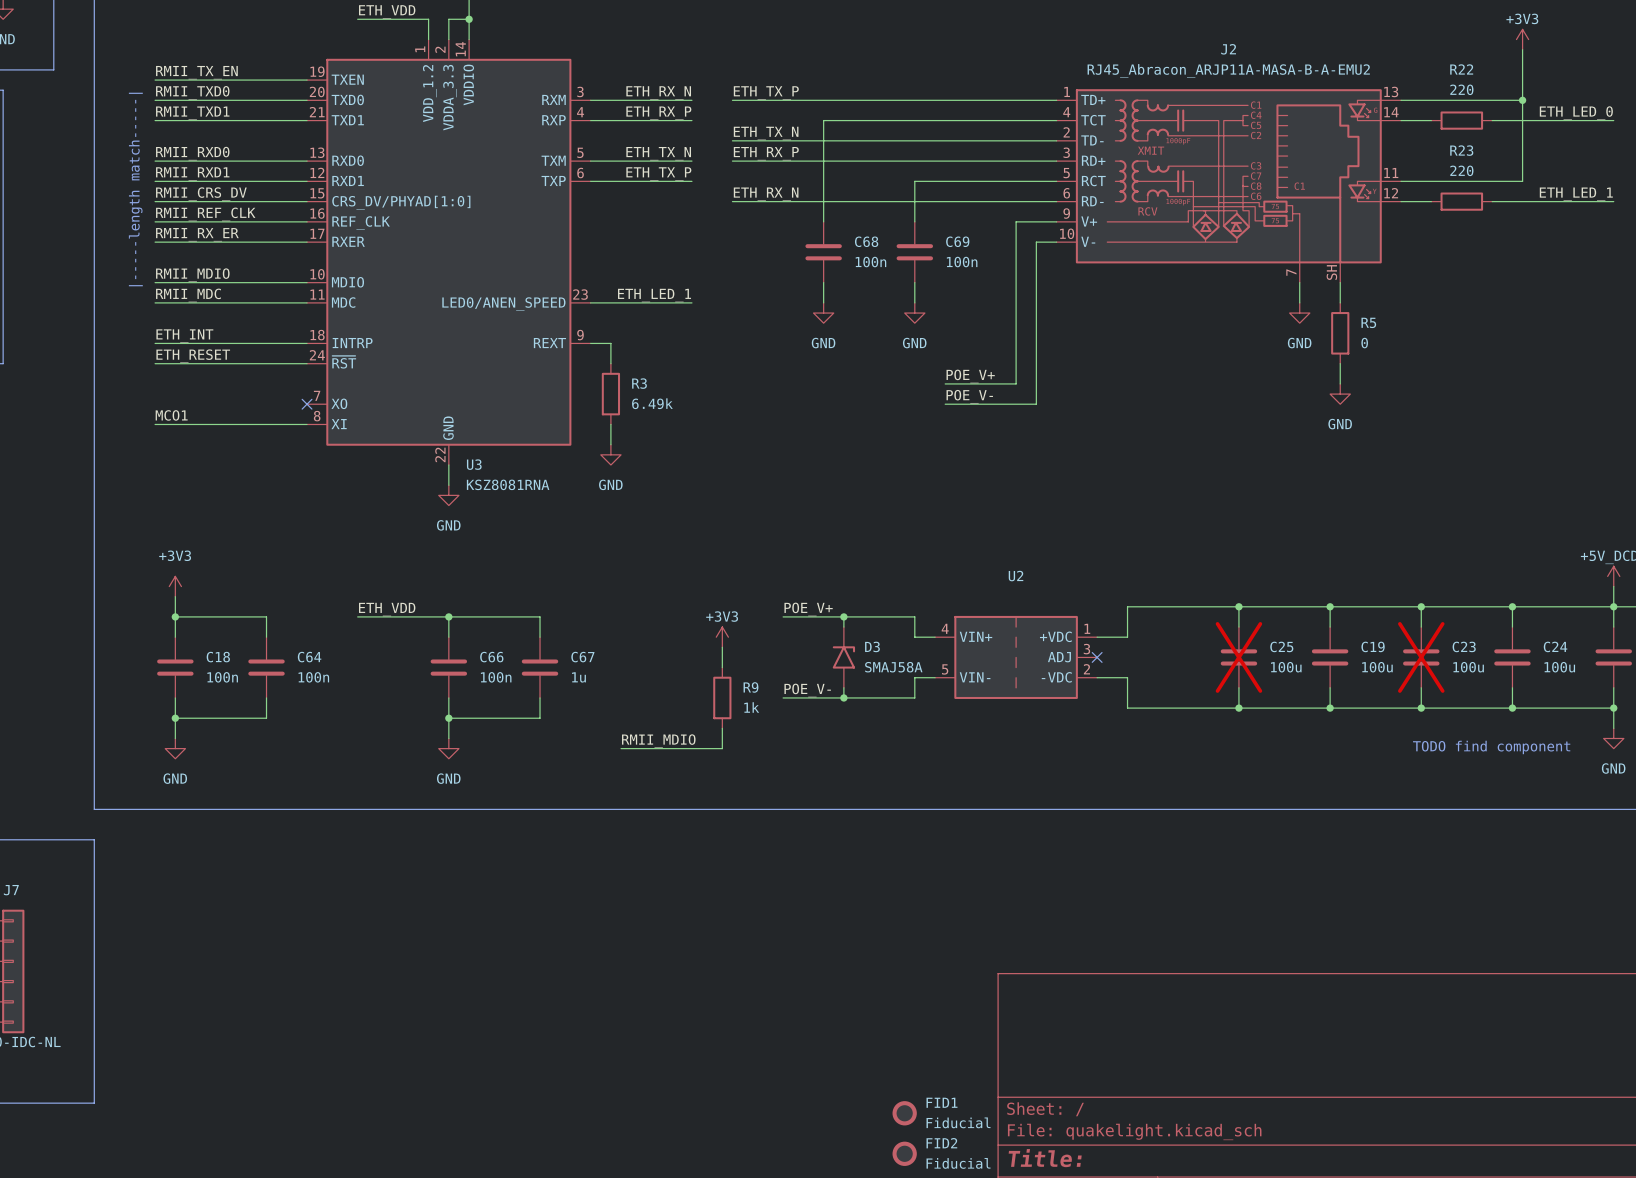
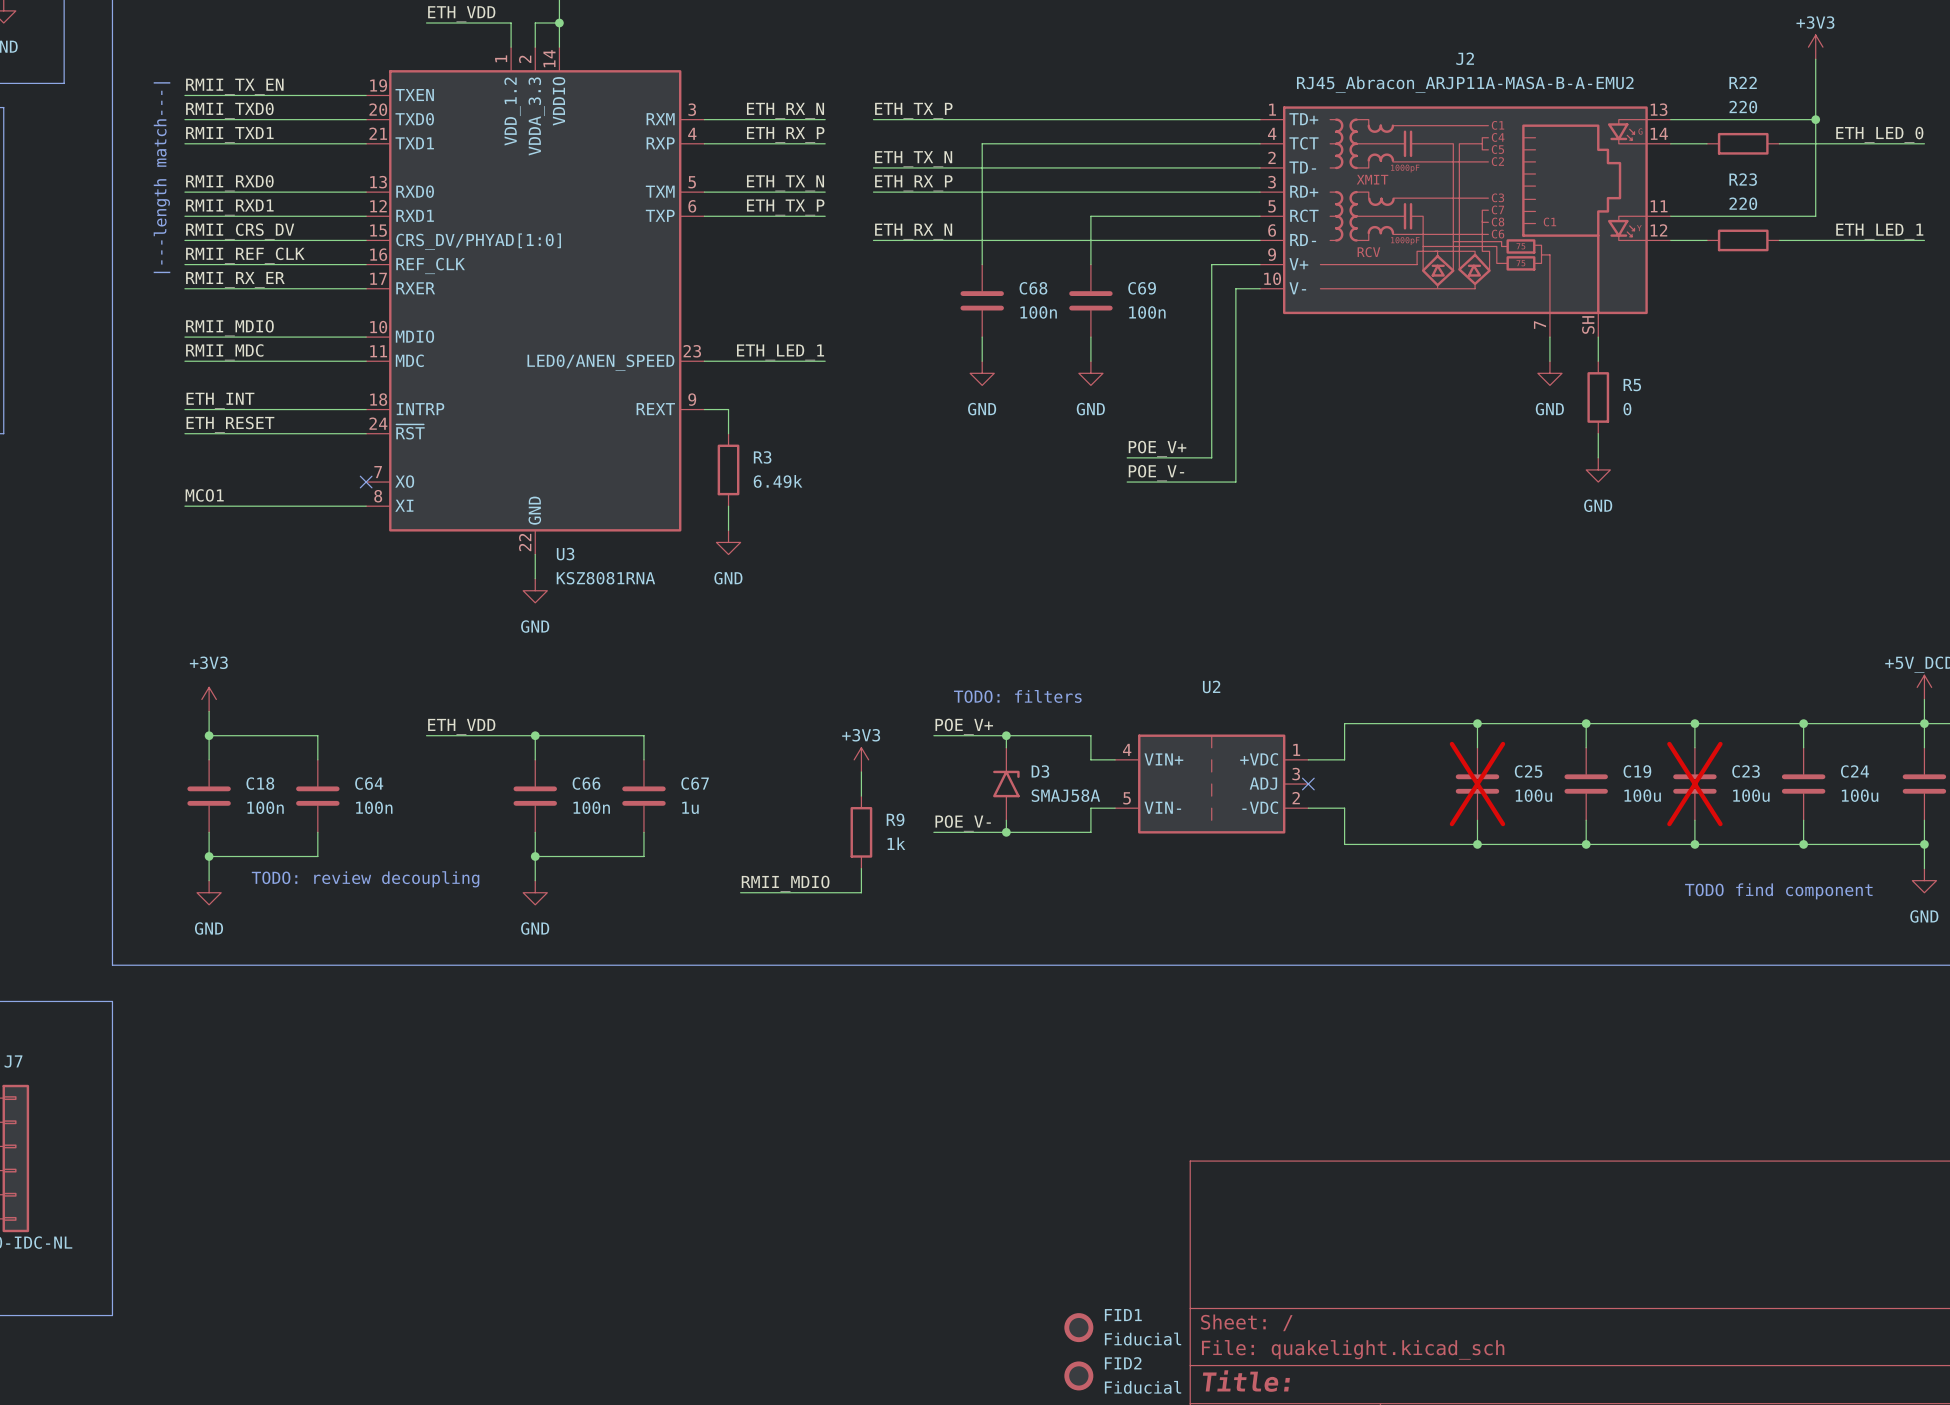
text: |-----length match-----| (135, 189) -> |---length match---| (161, 177)
text: none -> TODO: filters (1017, 696)
text: none -> TODO: review decoupling (365, 879)

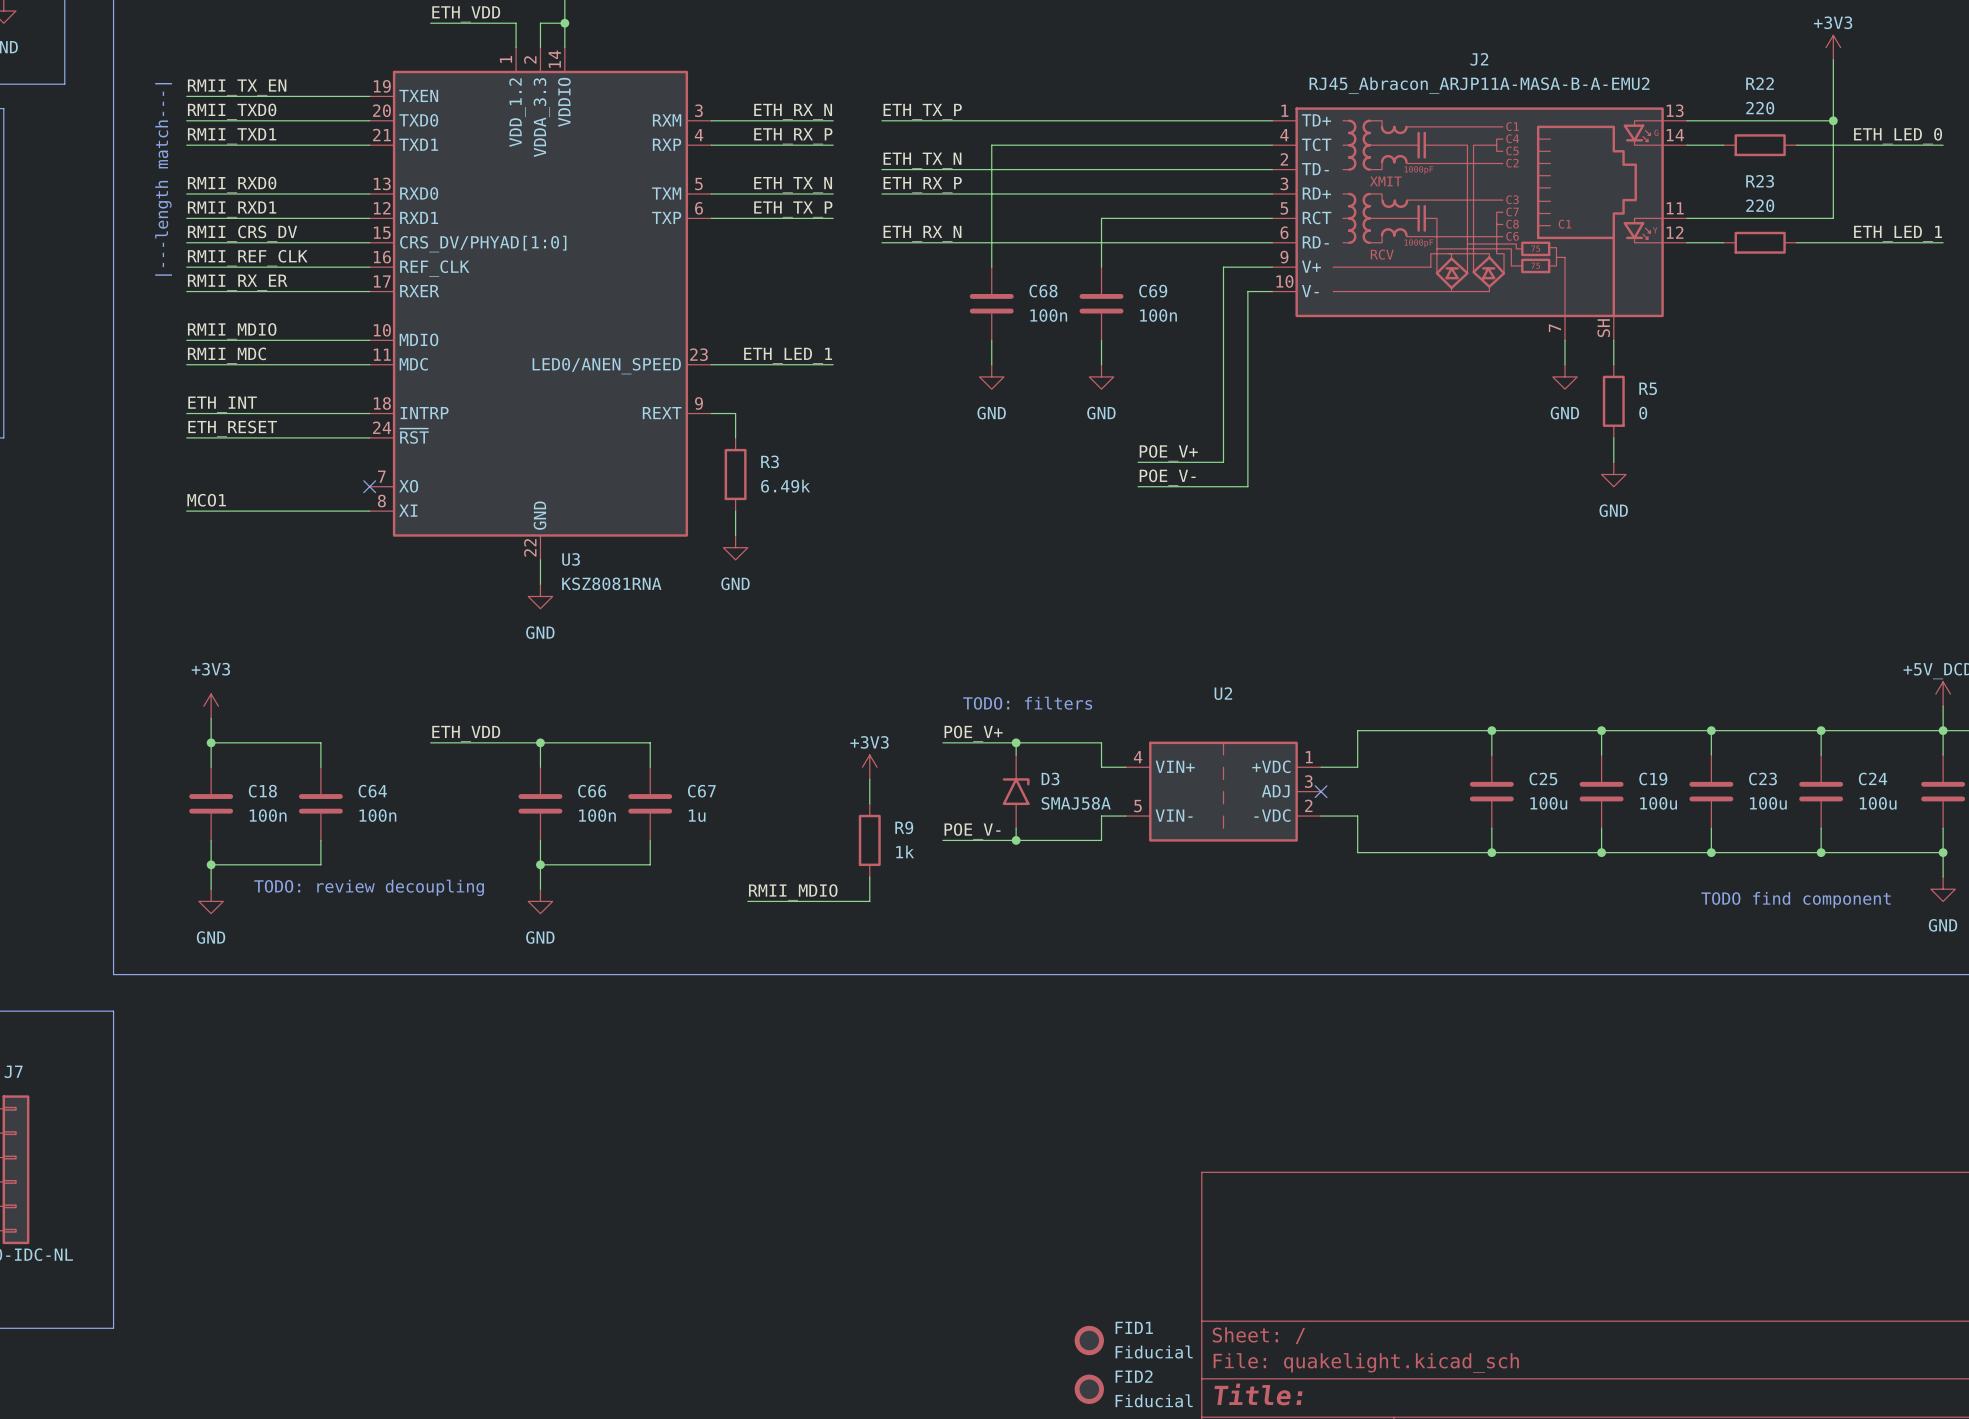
C25 do-not-place cross: (1477, 784) -> none
C23 do-not-place cross: (1694, 784) -> none

